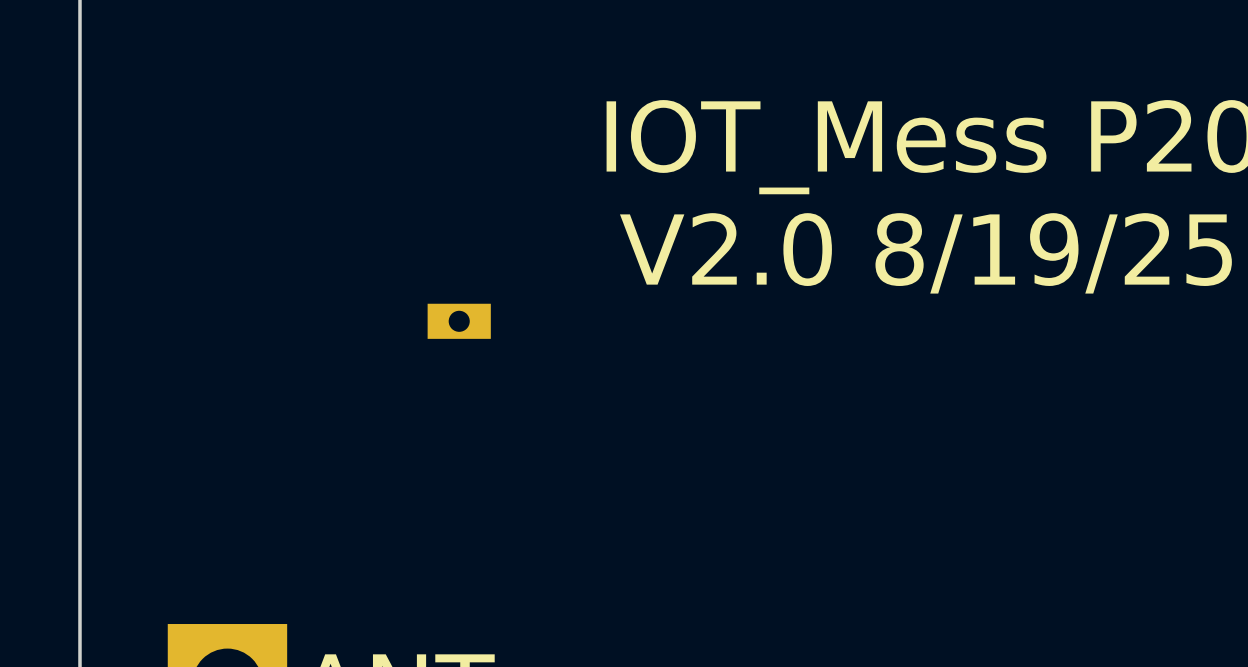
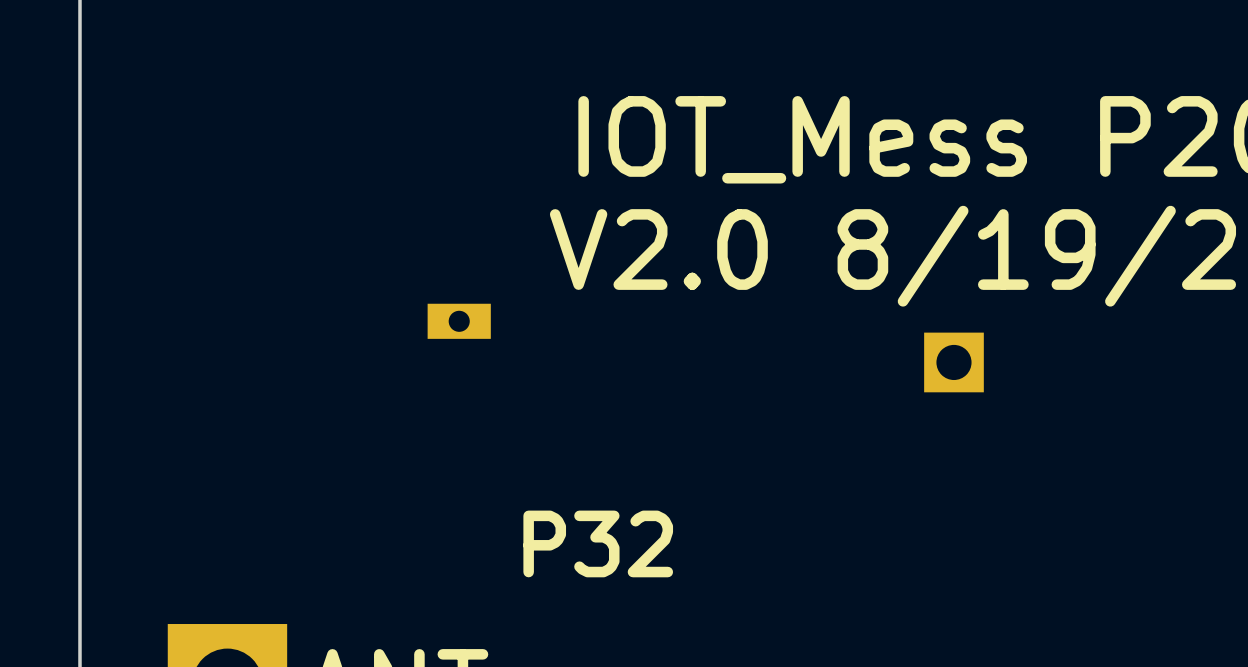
part: none -> (953, 362)
text: none -> P32 (598, 543)

